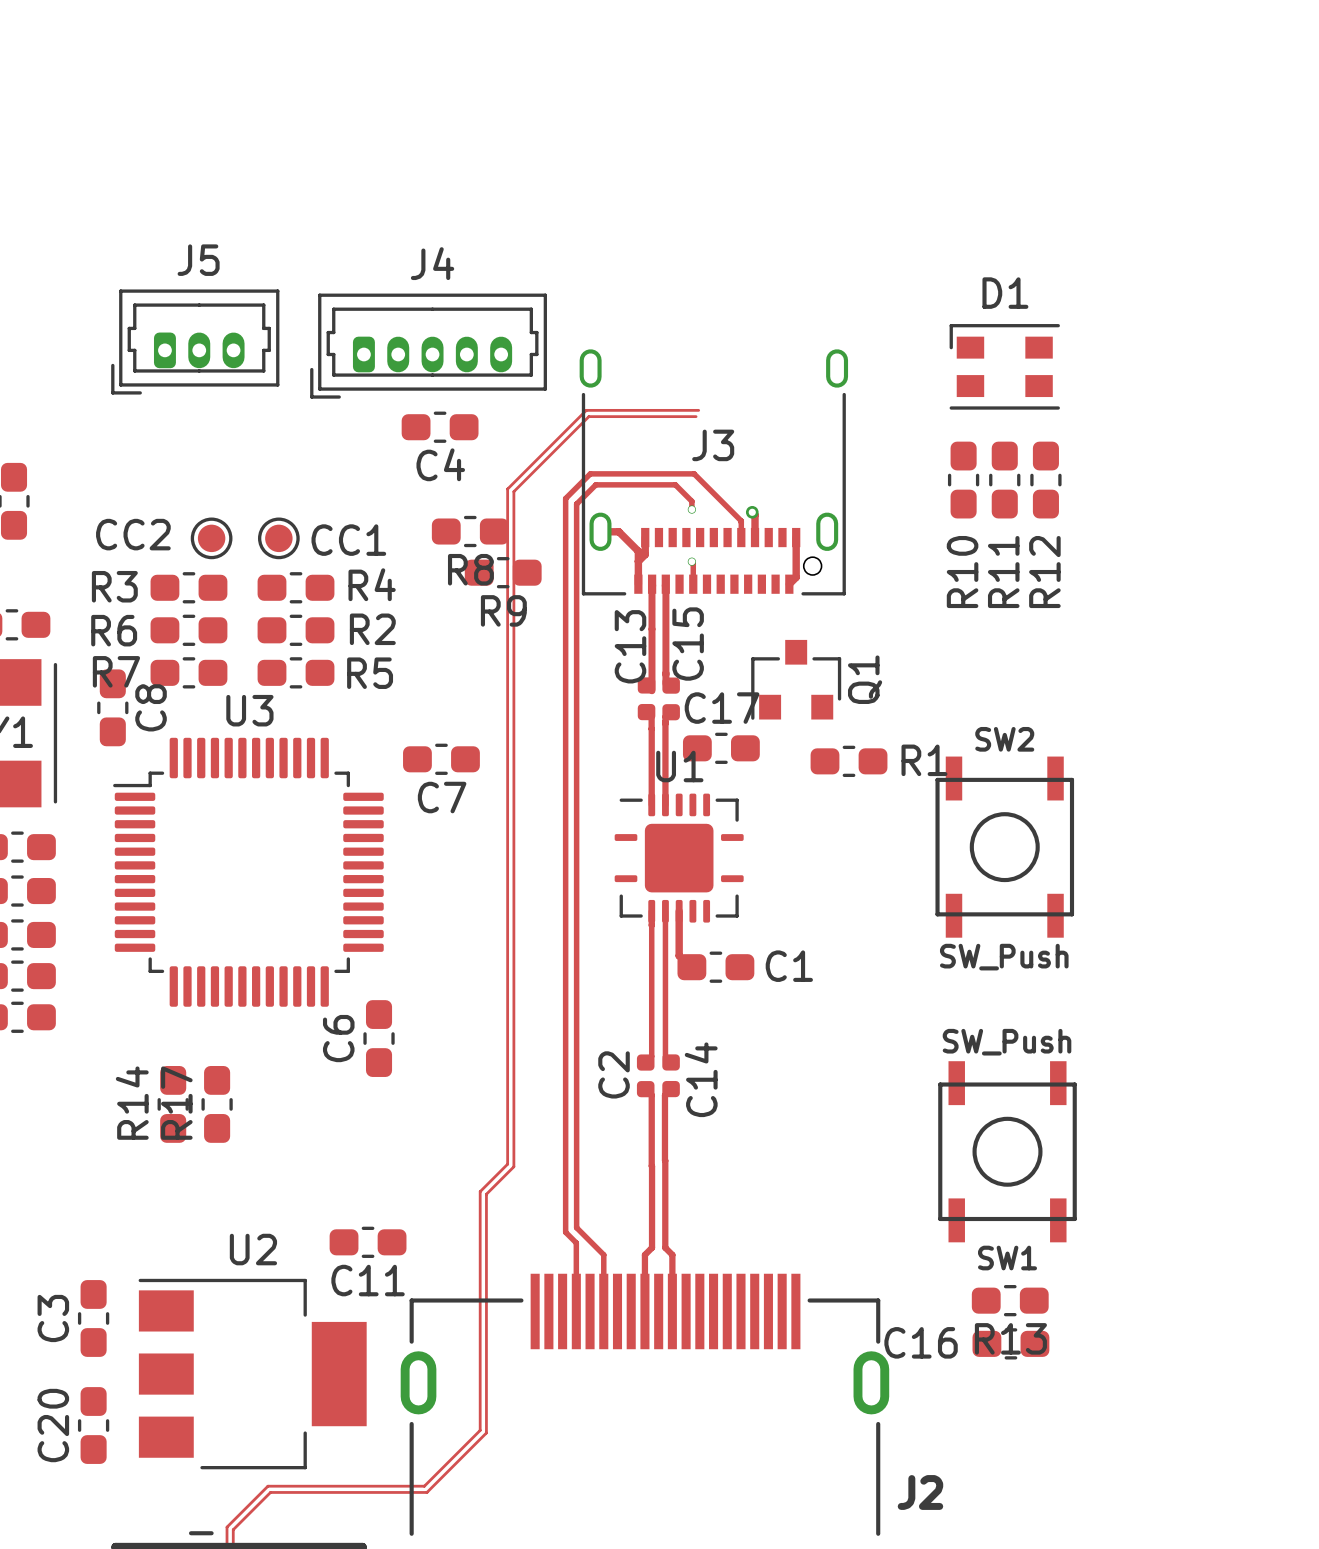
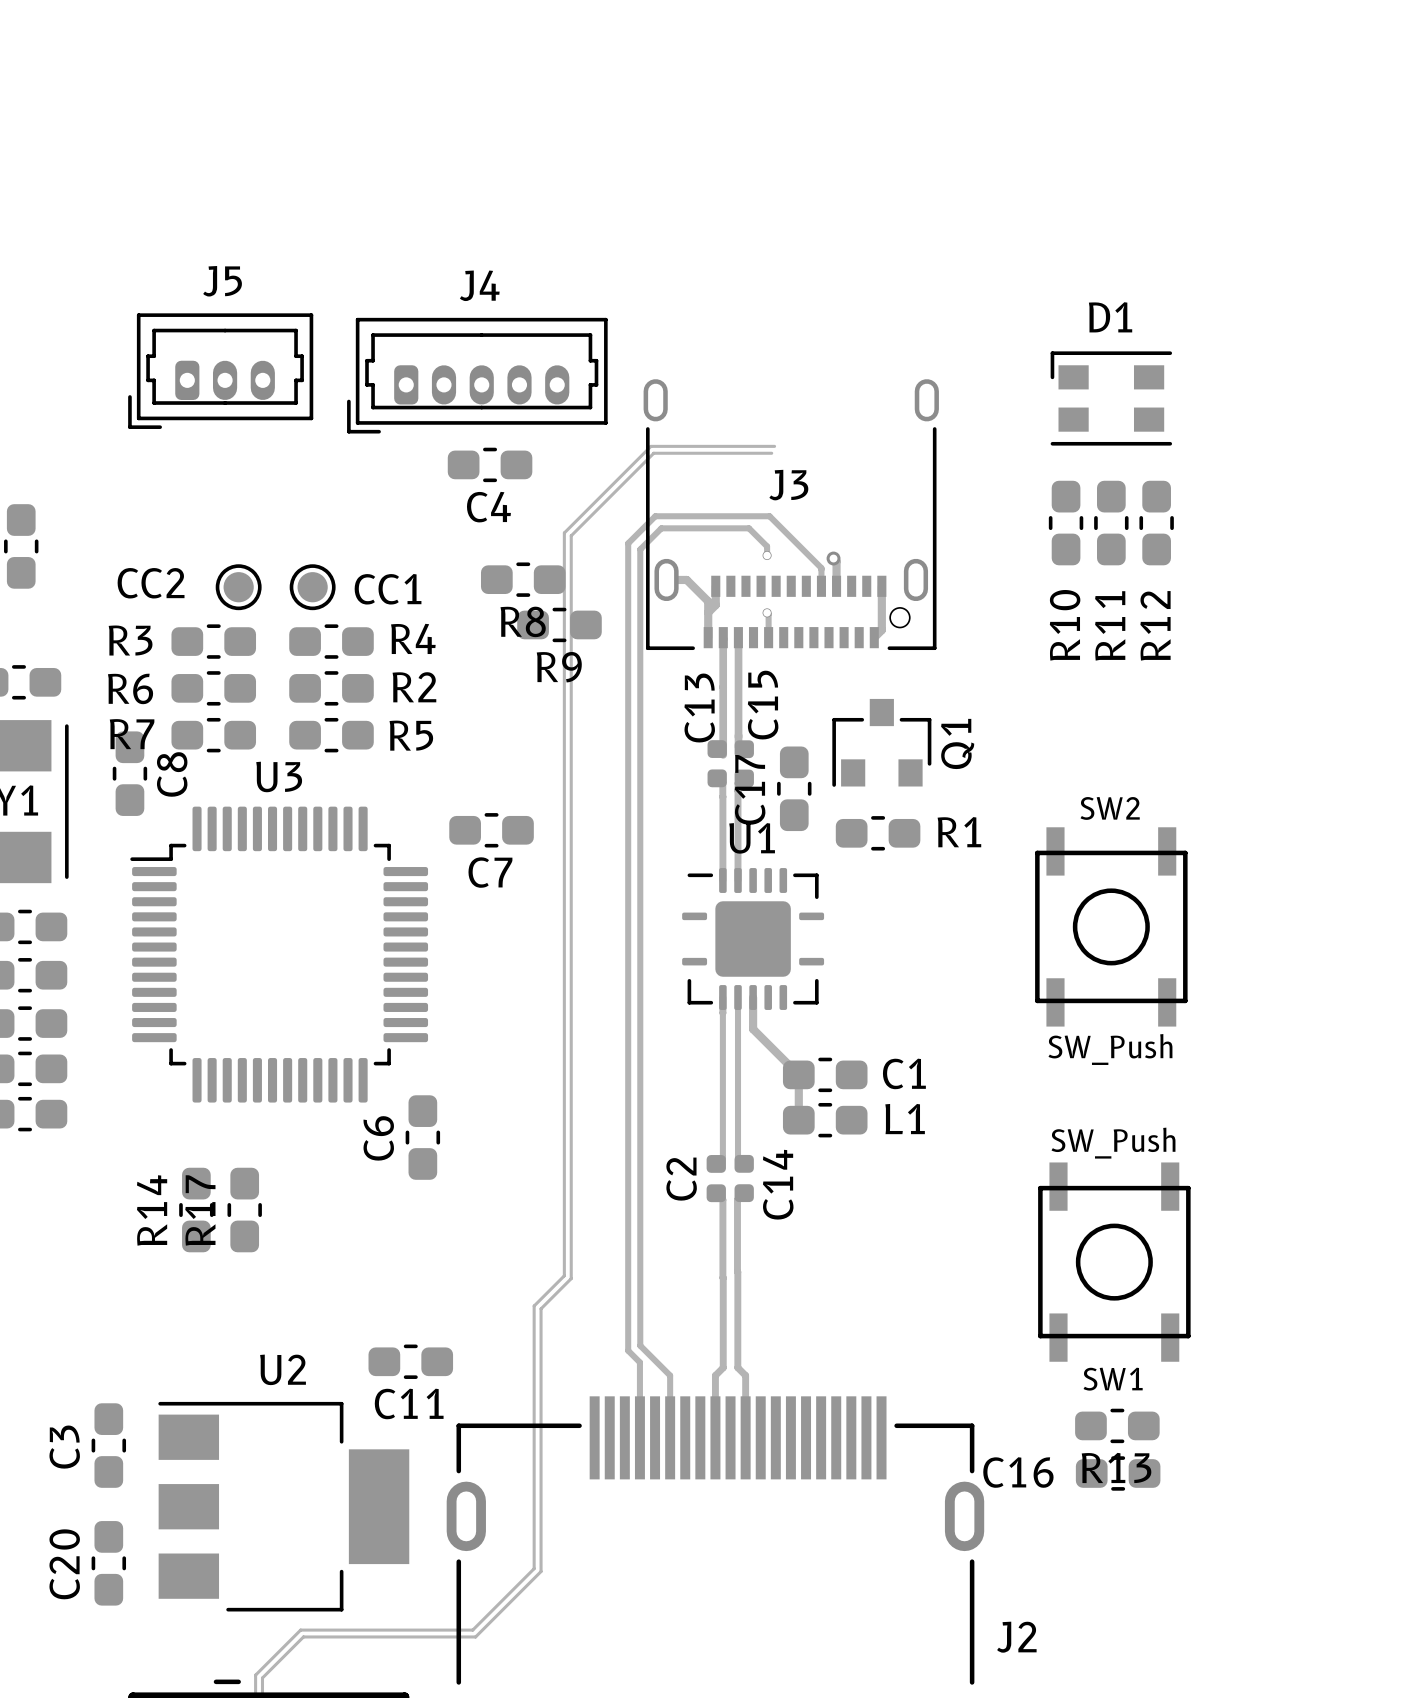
C17 name position: C17 (722, 708) -> C17 (750, 789)
C17 rotation: 0° (721, 748) -> 90° clockwise (794, 788)
R1 position: (849, 761) -> (878, 833)
track: (679, 940) (679, 955) (690, 967) -> (753, 1029) (798, 1074) (798, 1120)
C1 position: (715, 967) -> (825, 1074)
L1: none -> (825, 1120)

